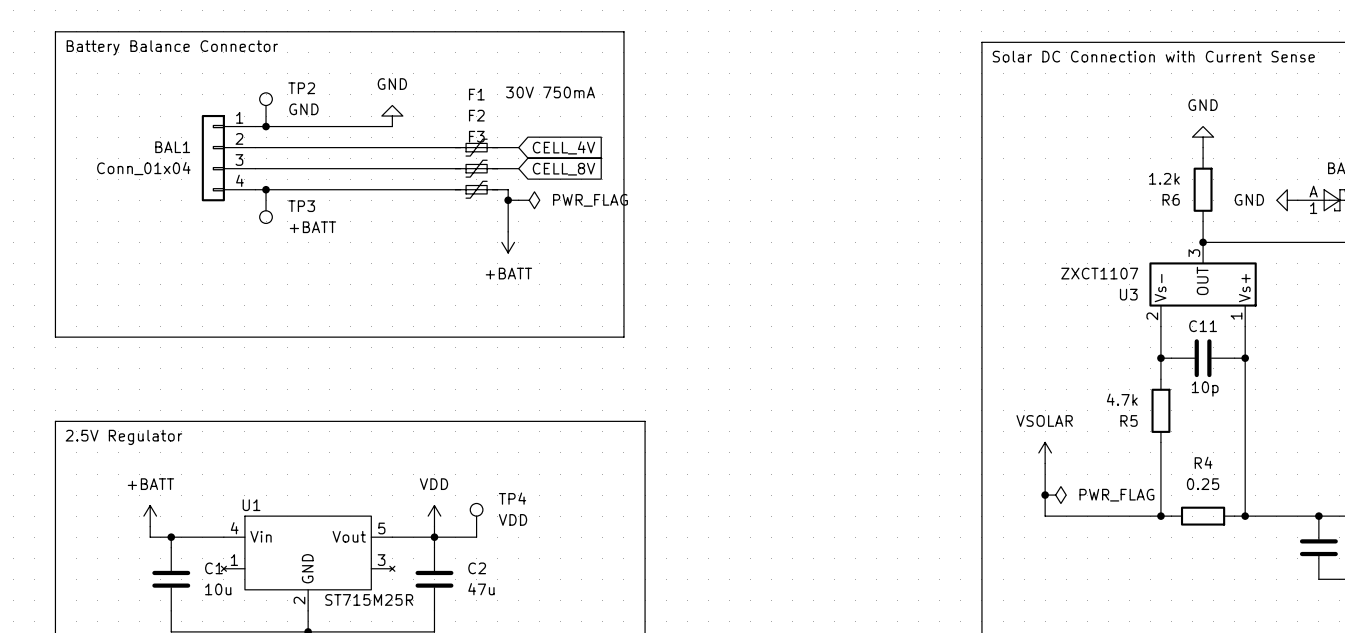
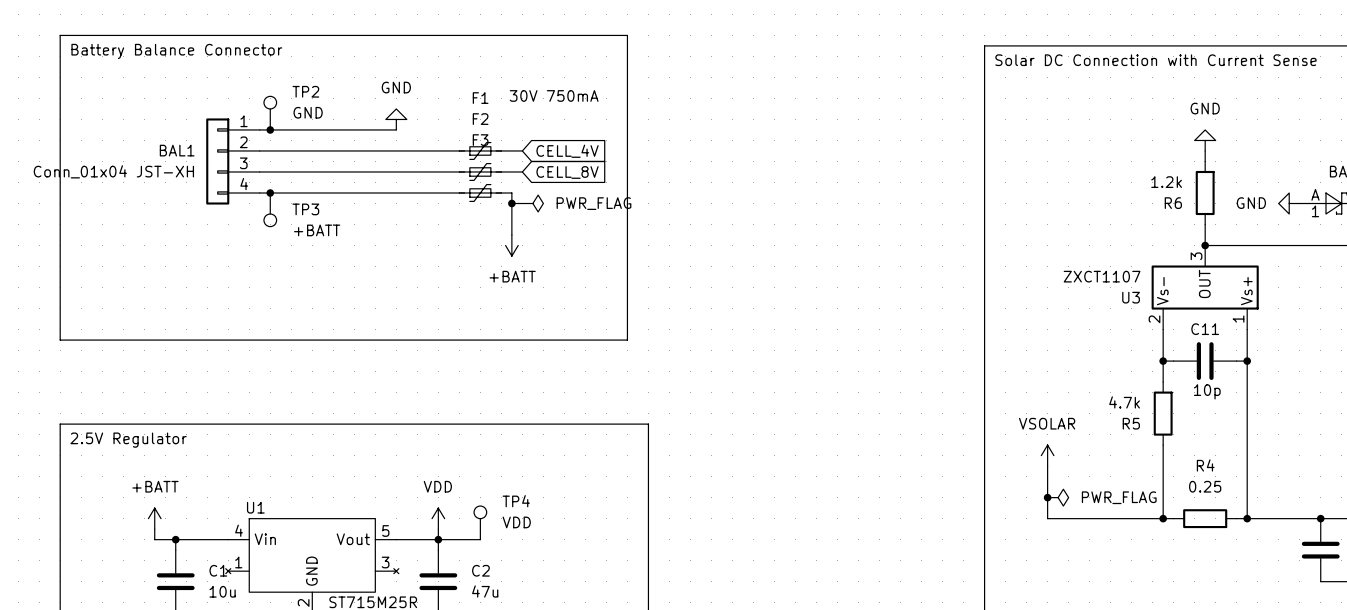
BAL1 value: Conn_01x04 (143, 168) -> Conn_01x04 JST-XH (113, 171)

